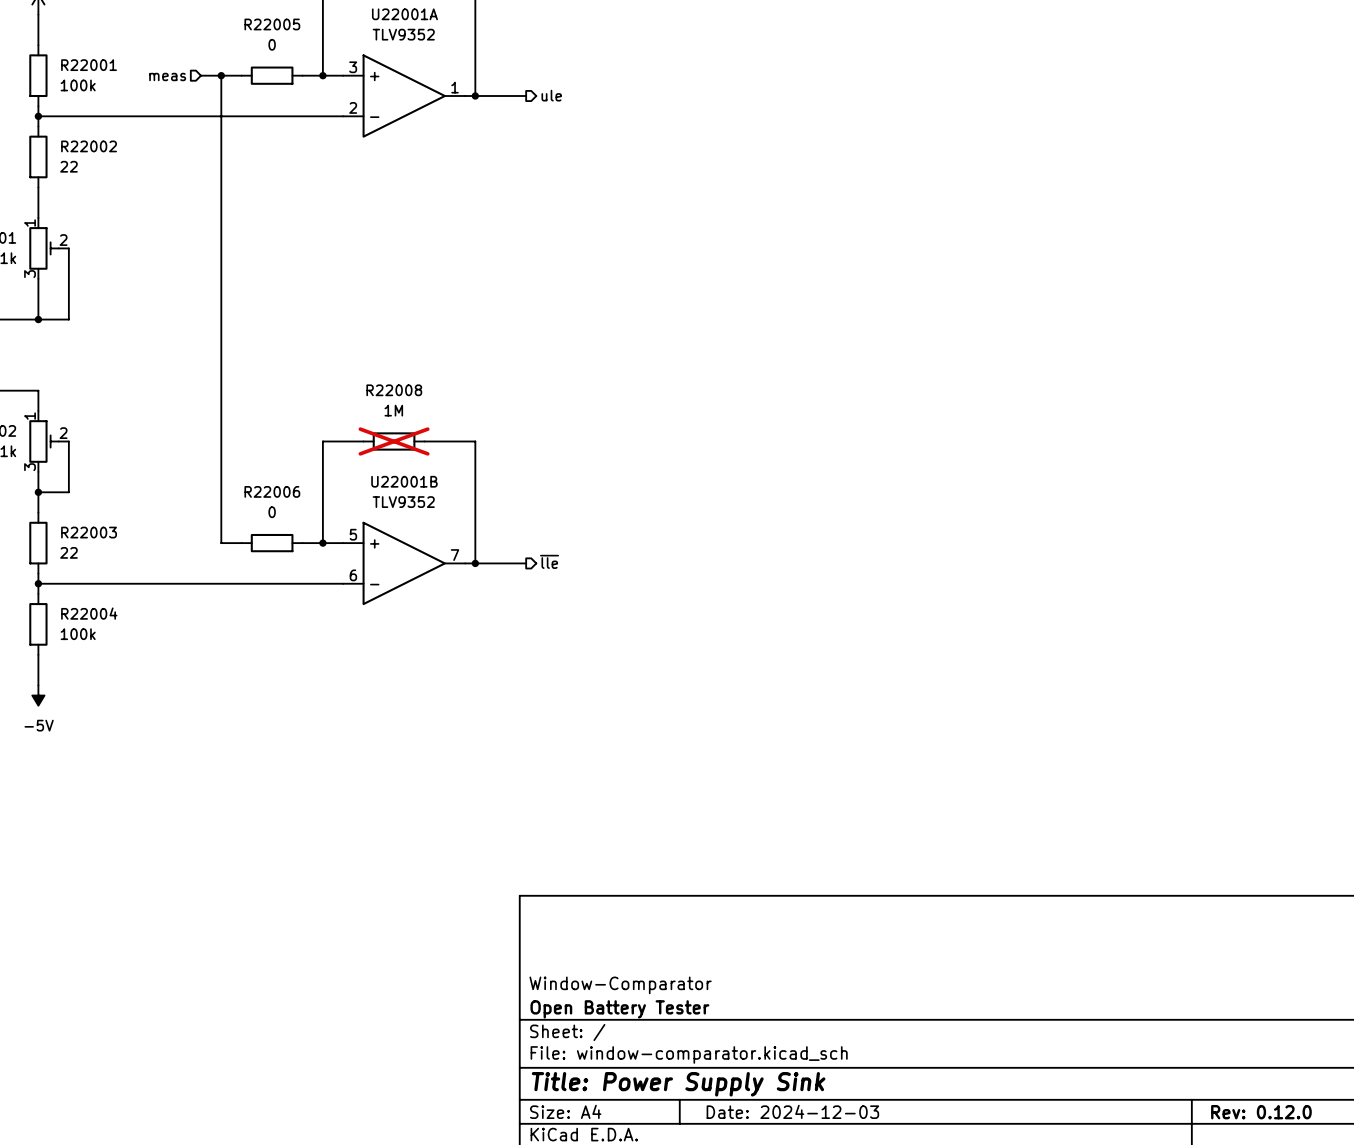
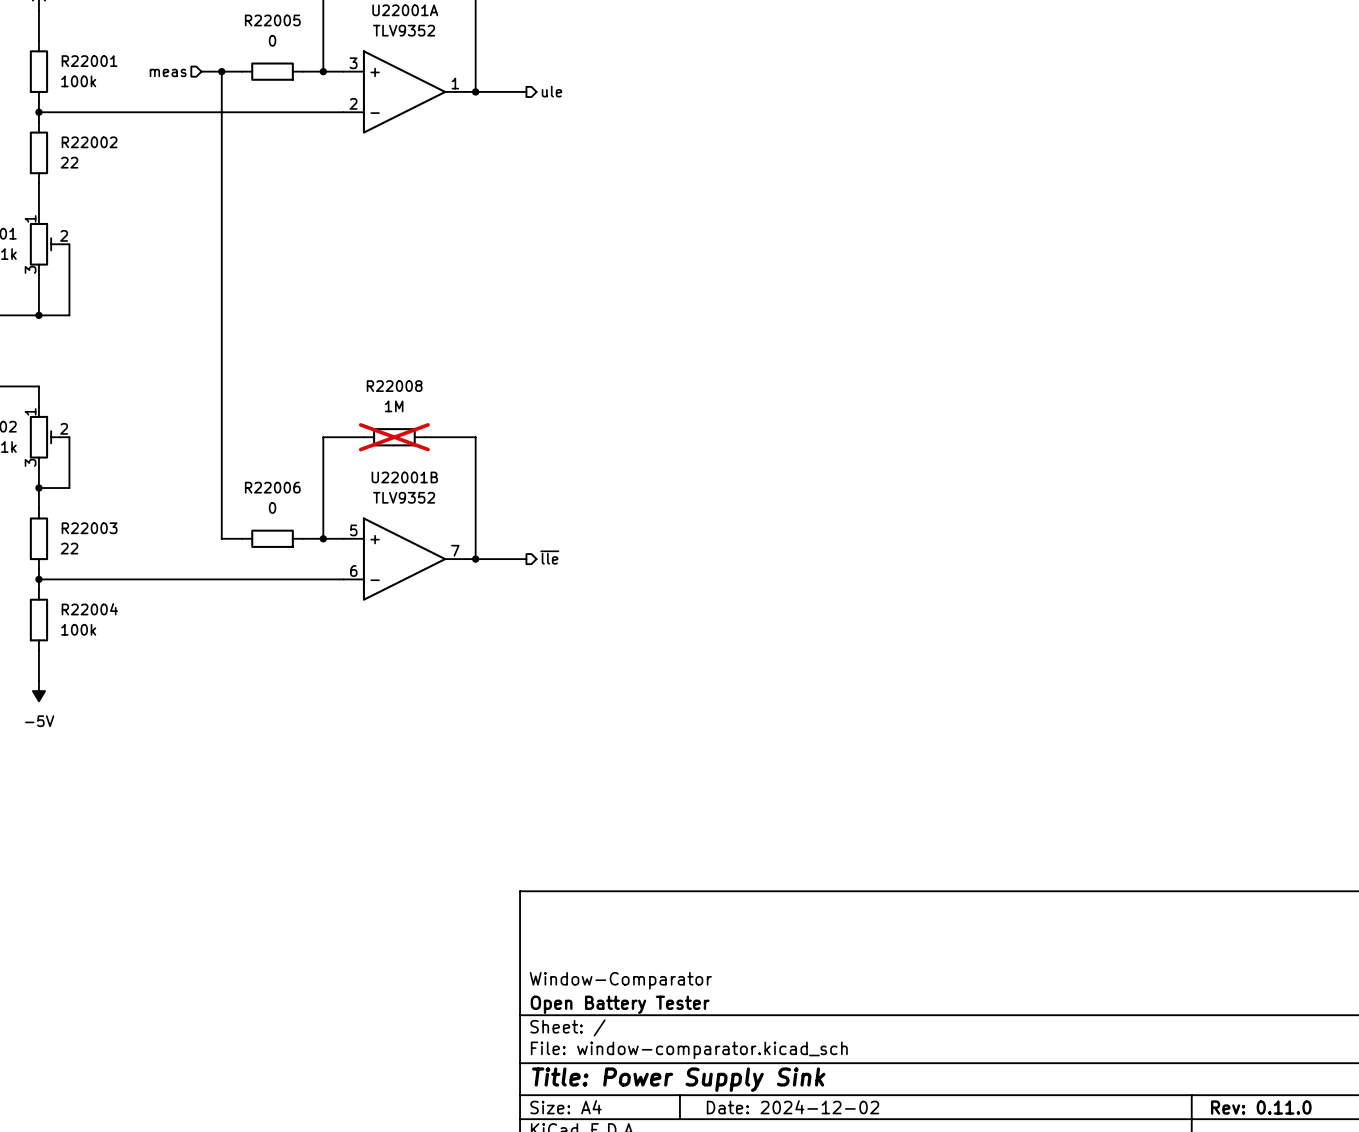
title block: Date: 2024-12-03 (792, 1111) -> Date: 2024-12-02 (793, 1107)
title block: Rev: 0.12.0 (1261, 1112) -> Rev: 0.11.0 (1261, 1107)

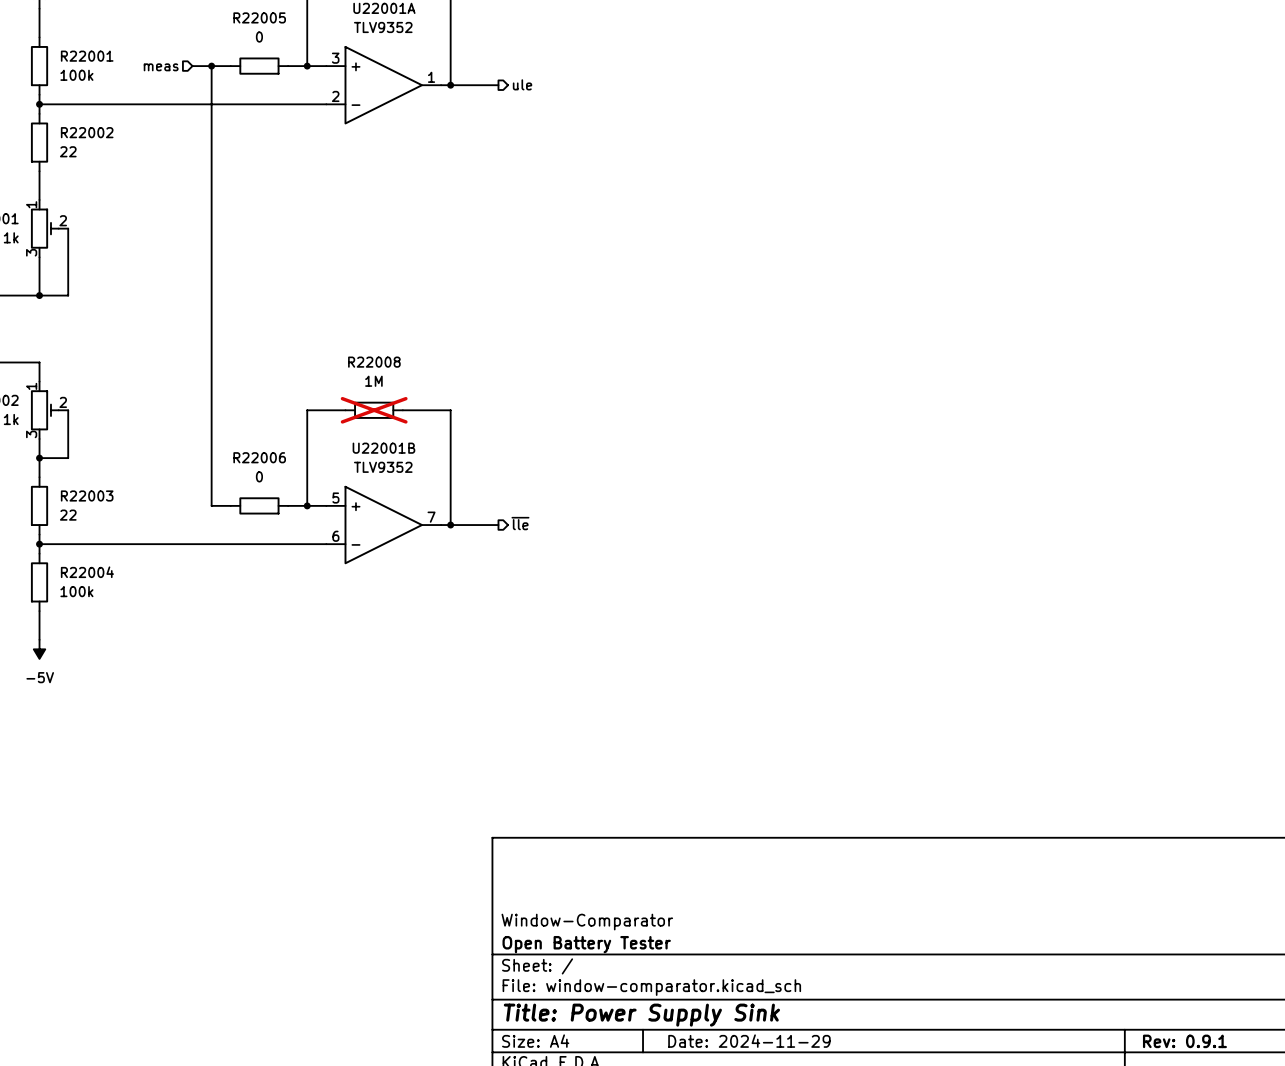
title block: Date: 2024-12-02 (793, 1107) -> Date: 2024-11-29 (749, 1041)
title block: Rev: 0.11.0 (1261, 1107) -> Rev: 0.9.1 (1184, 1041)

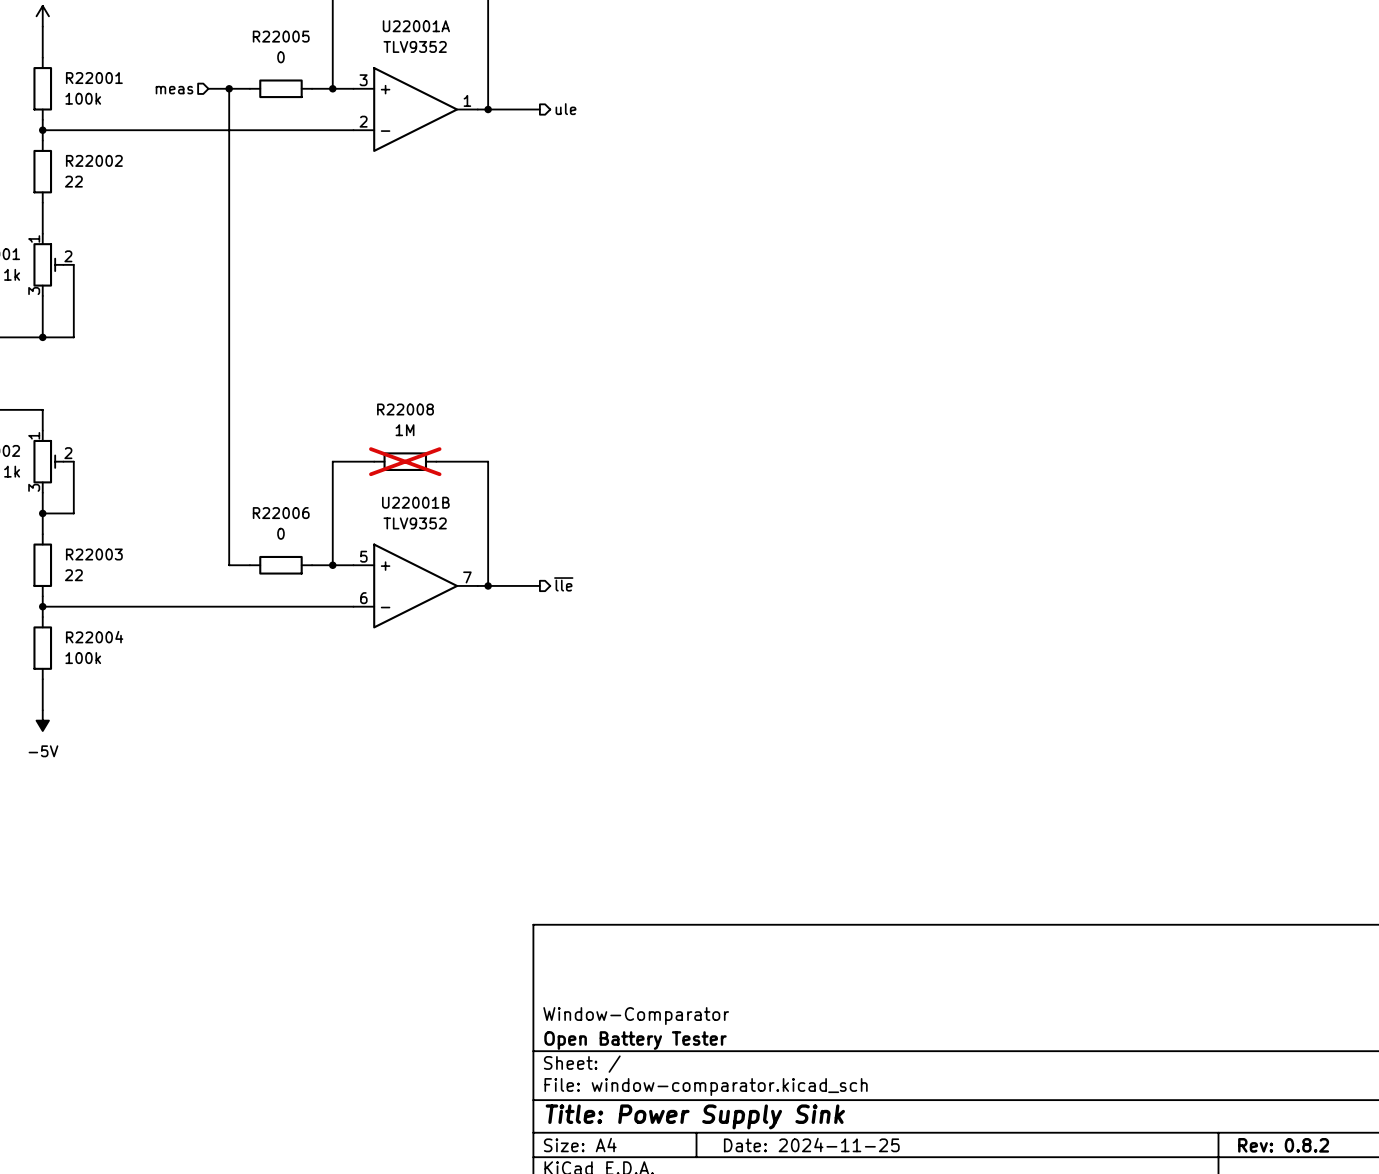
title block: Date: 2024-11-29 (749, 1041) -> Date: 2024-11-25 (811, 1145)
title block: Rev: 0.9.1 (1184, 1041) -> Rev: 0.8.2 (1283, 1145)

